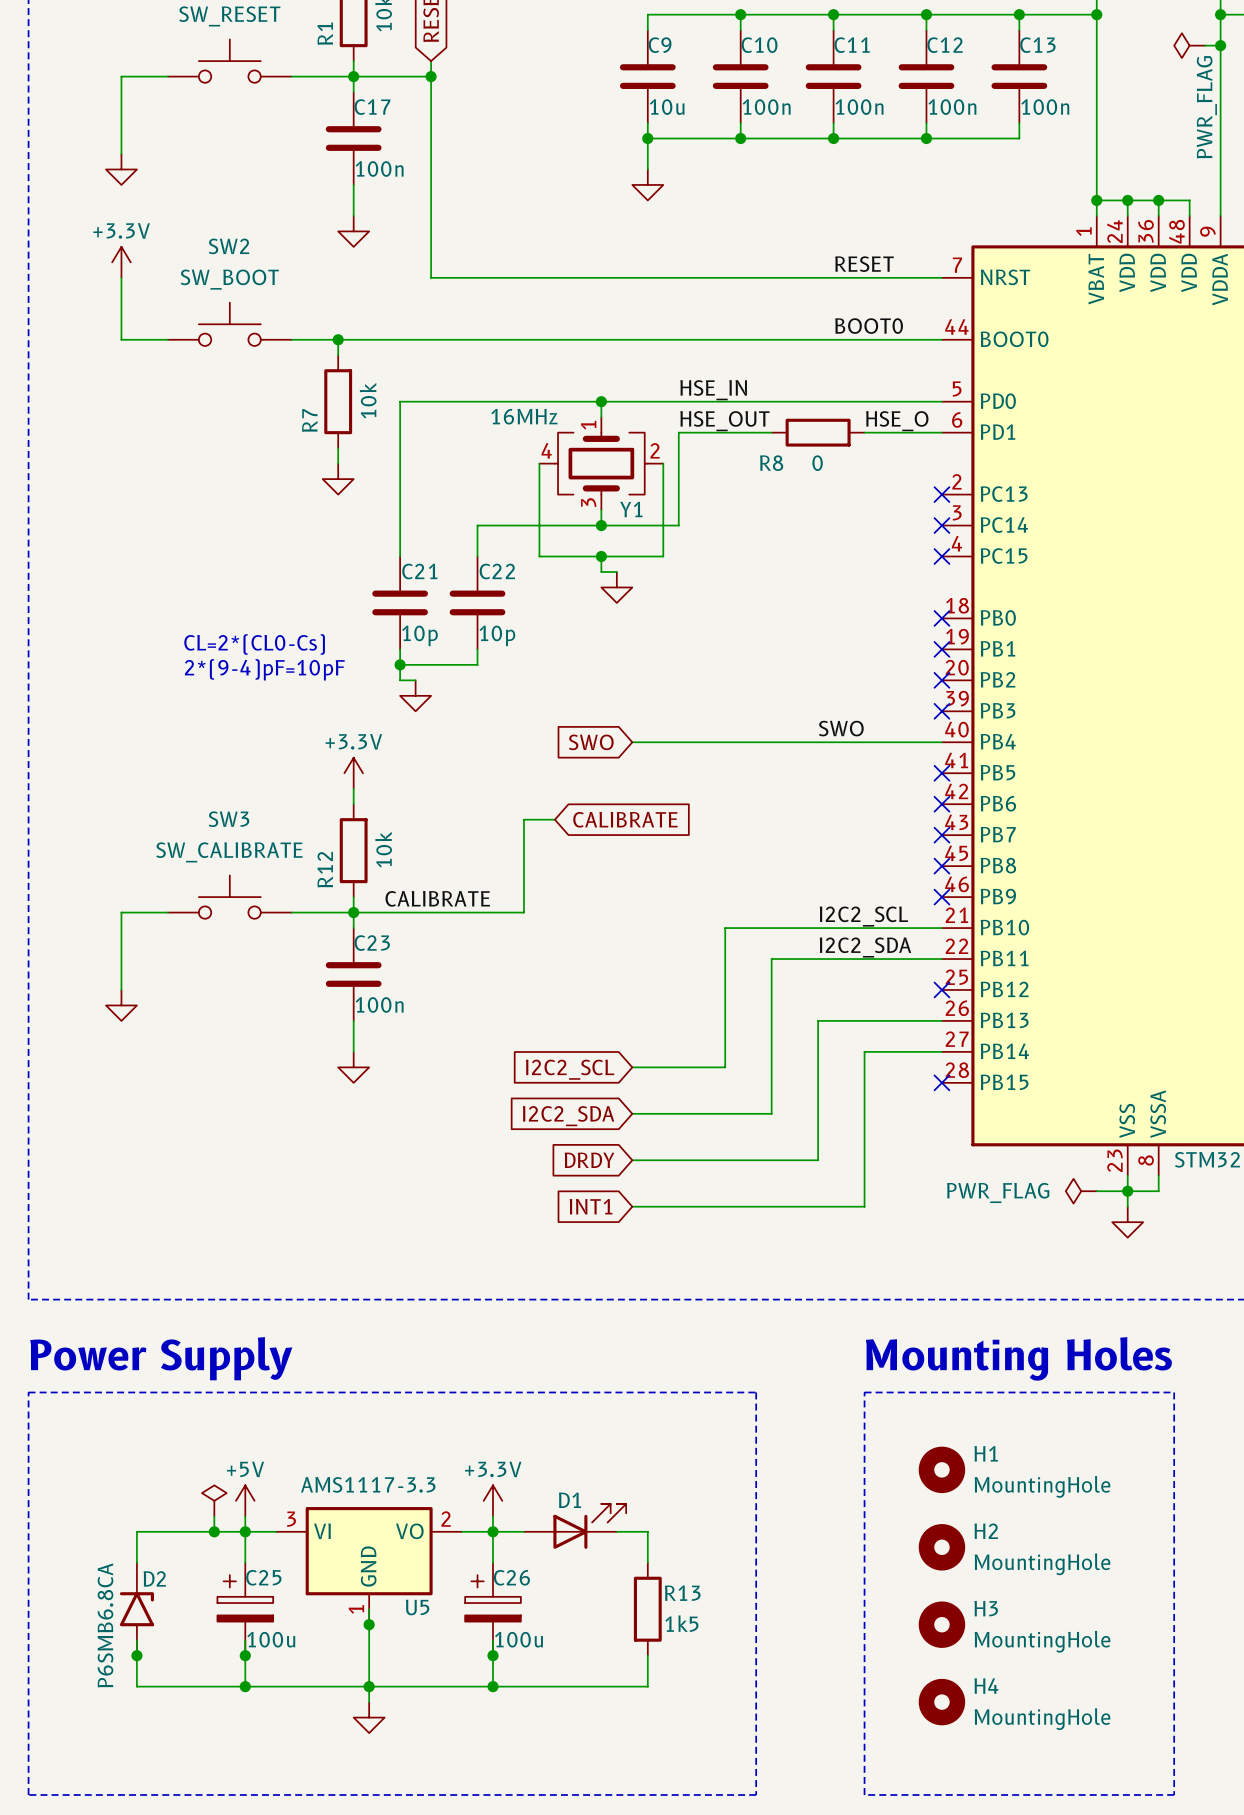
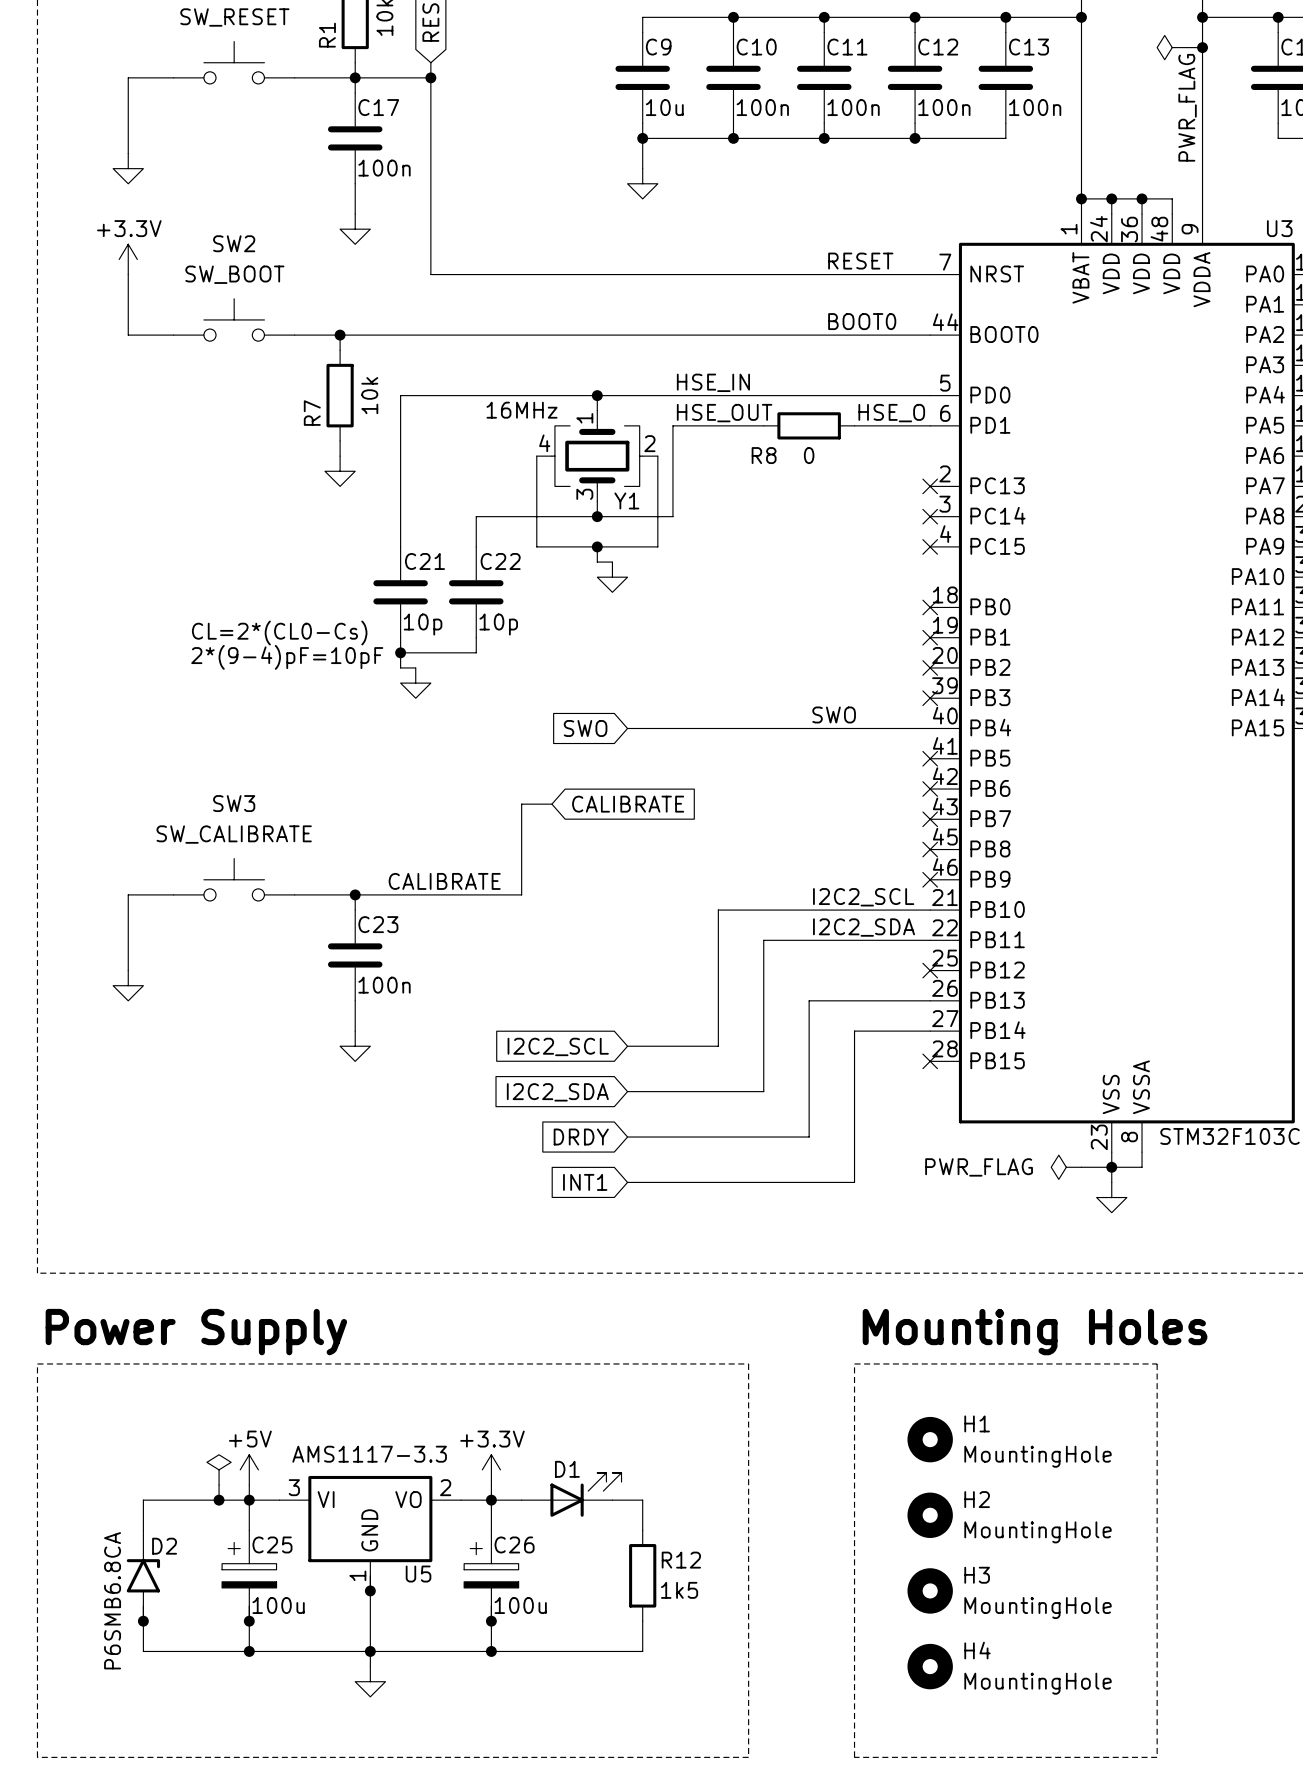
power symbol: +3.3V (353, 773) -> none
wire: (353, 788) (353, 804) -> none
R12: 10k (353, 850) -> none
wire: (353, 897) (353, 912) -> none
R13 name: R13 (682, 1593) -> R12 (681, 1560)

